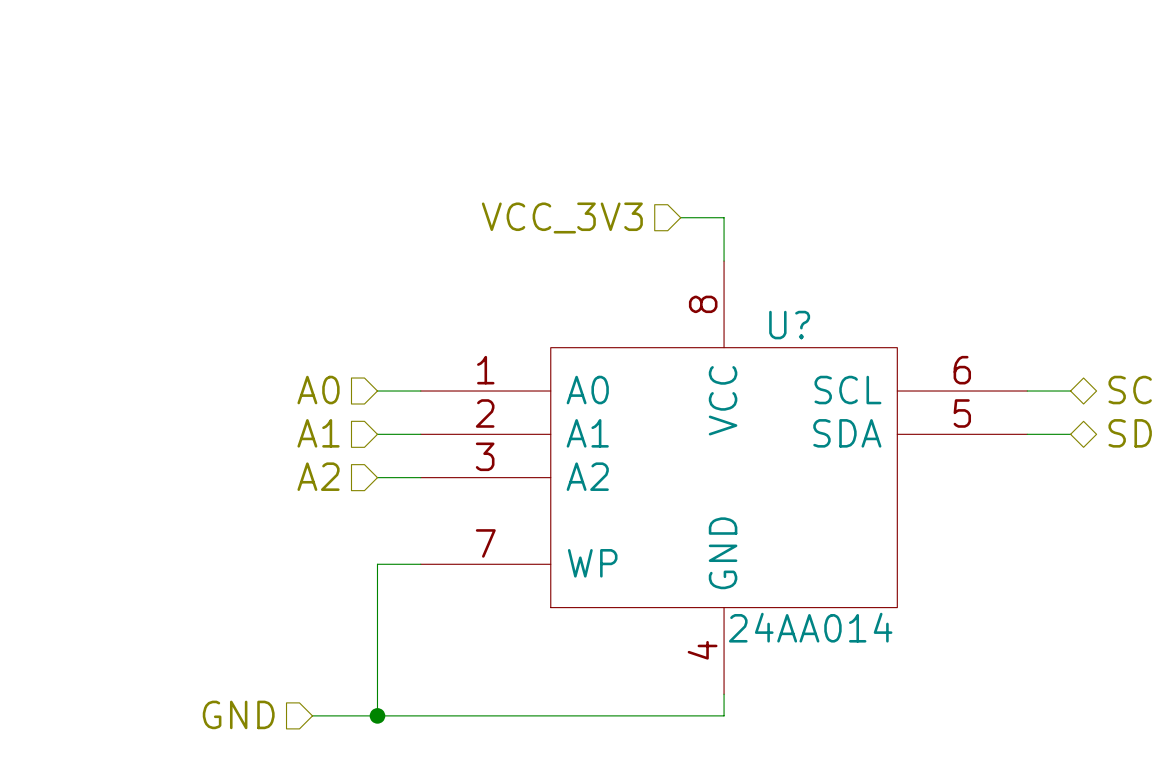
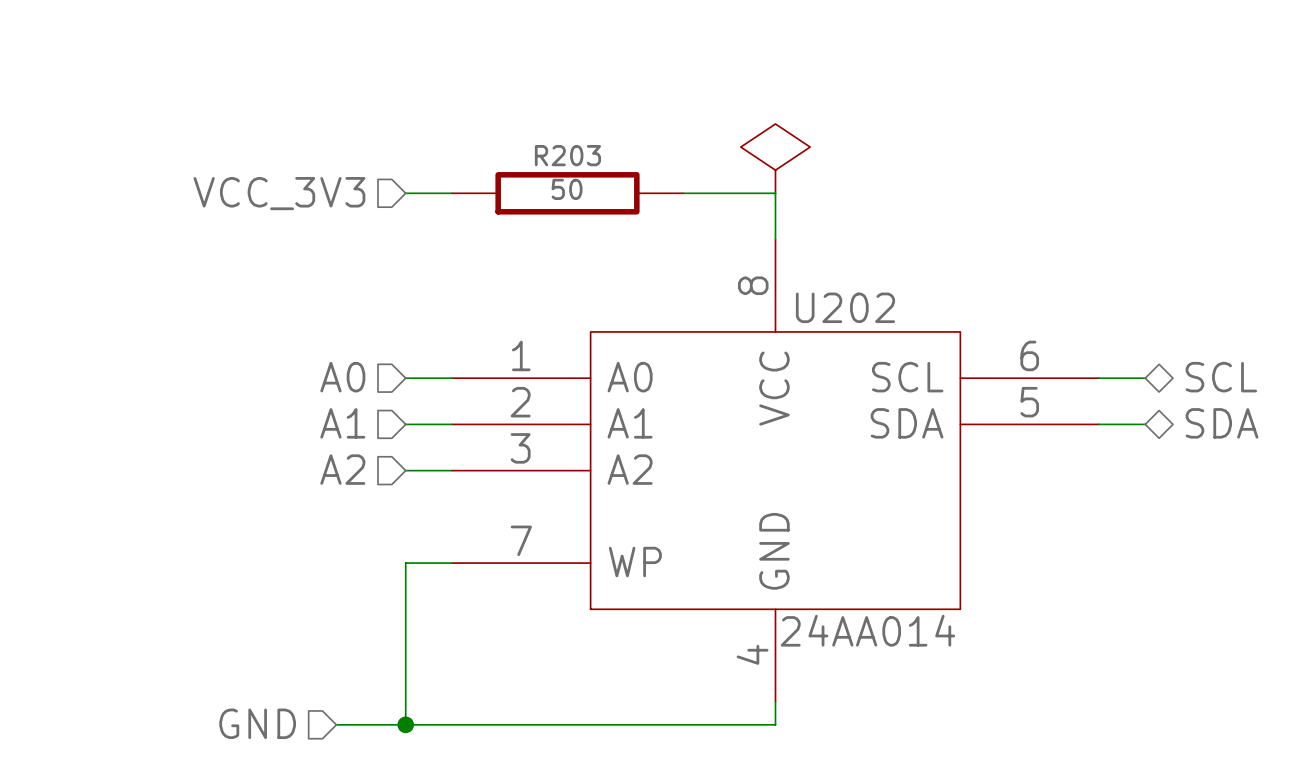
power symbol: none -> (775, 158)
wire: none -> (405, 193) (451, 193)
R203: none -> 50 (567, 193)
hierarchical label position: VCC_3V3 (562, 217) -> VCC_3V3 (279, 193)
wire: none -> (683, 193) (729, 193)
U? name: U? (789, 325) -> U202 (845, 307)

